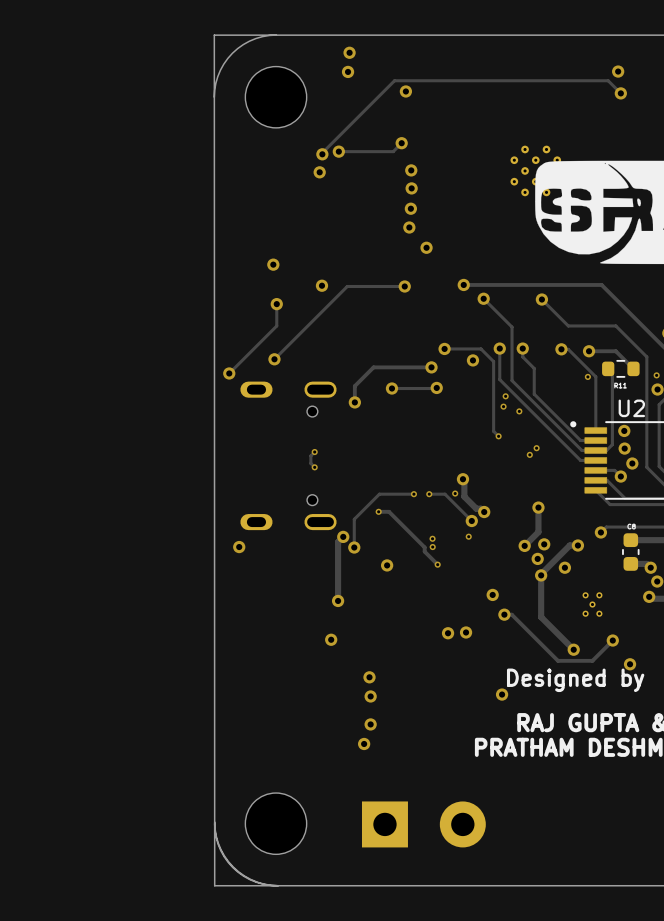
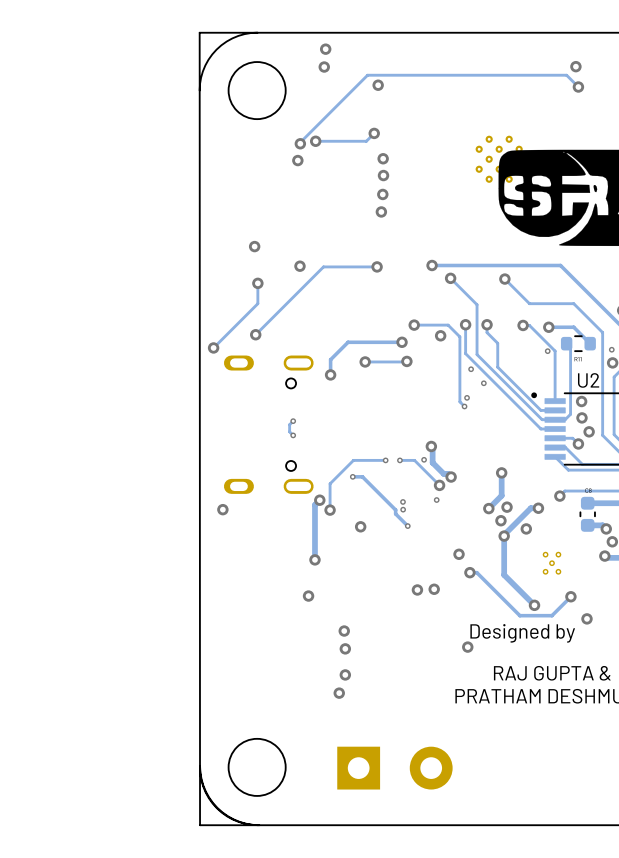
via: (426, 247) -> none
via: (503, 406) -> none
via: none -> (467, 397)
via: (536, 448) -> none
via: (529, 454) -> none

